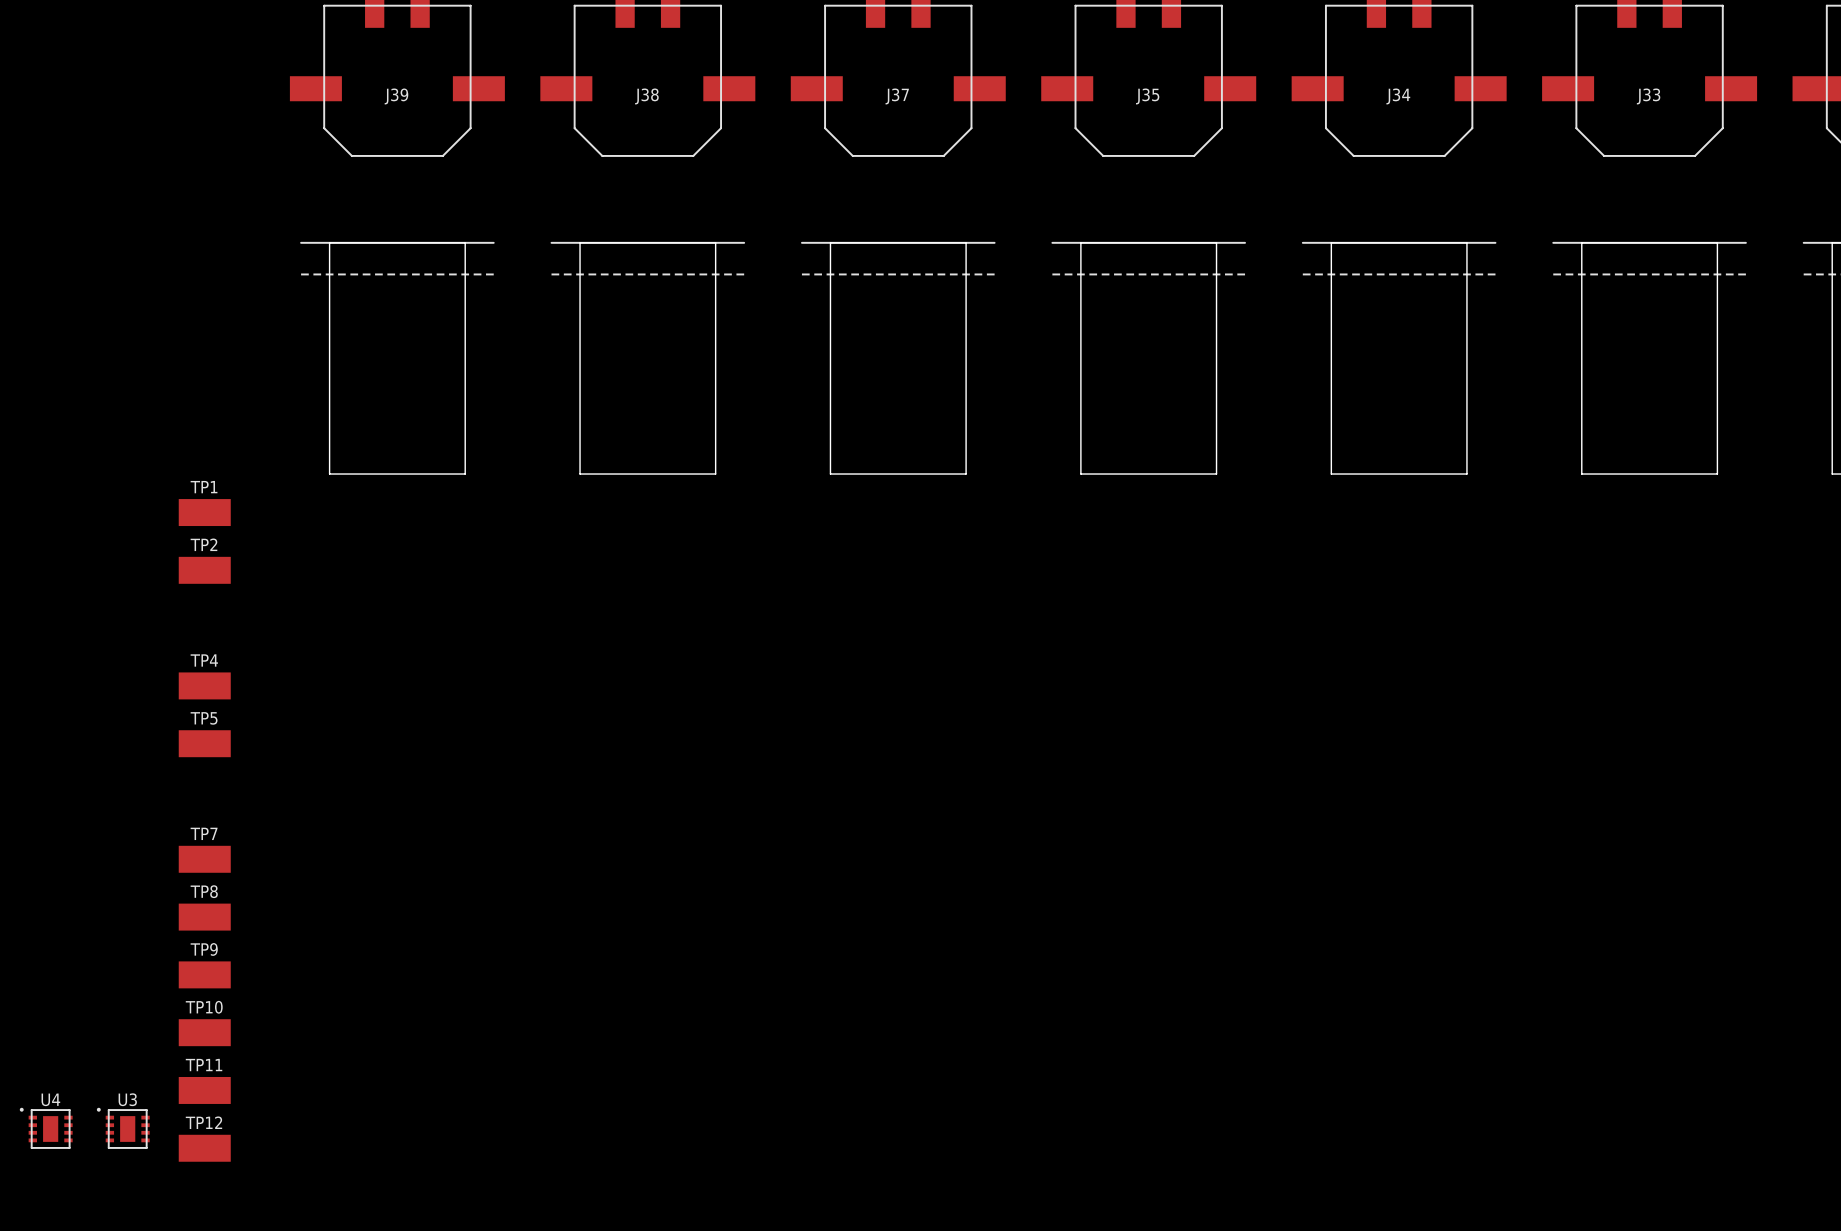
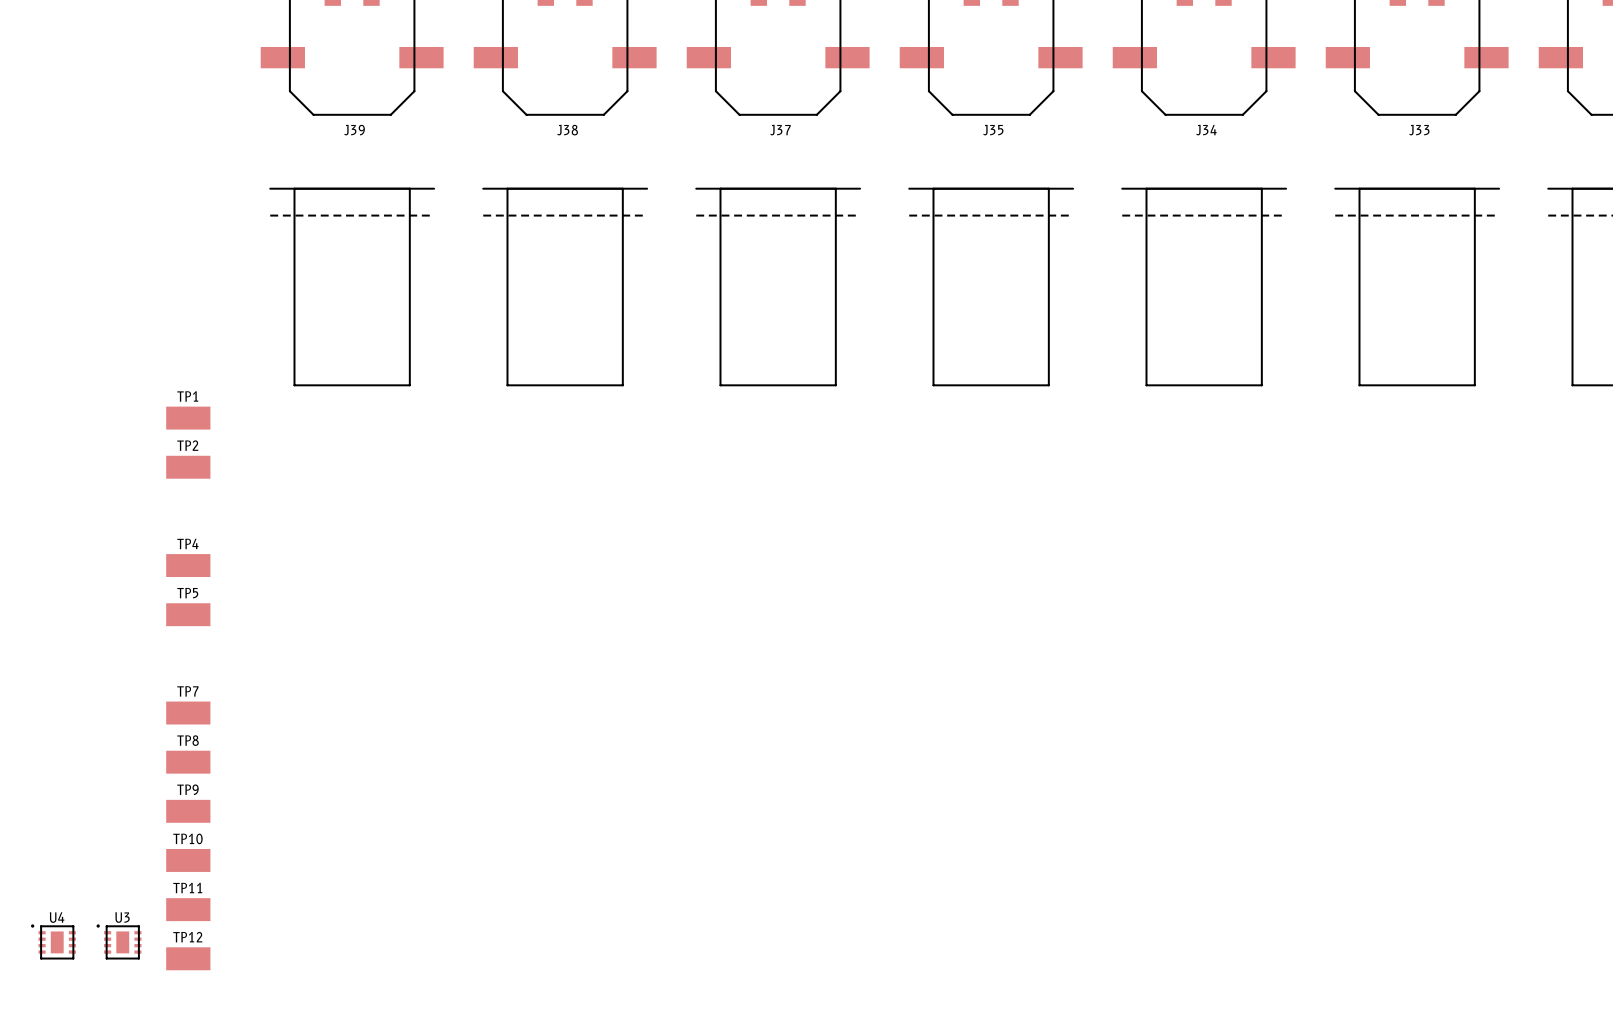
J39 name position: J39 (396, 96) -> J39 (354, 130)
J38 name position: J38 (646, 96) -> J38 (567, 130)
J37 name position: J37 (897, 96) -> J37 (780, 130)
J35 name position: J35 (1147, 96) -> J35 (993, 130)
J34 name position: J34 (1398, 96) -> J34 (1206, 130)
J33 name position: J33 (1648, 96) -> J33 (1419, 130)

